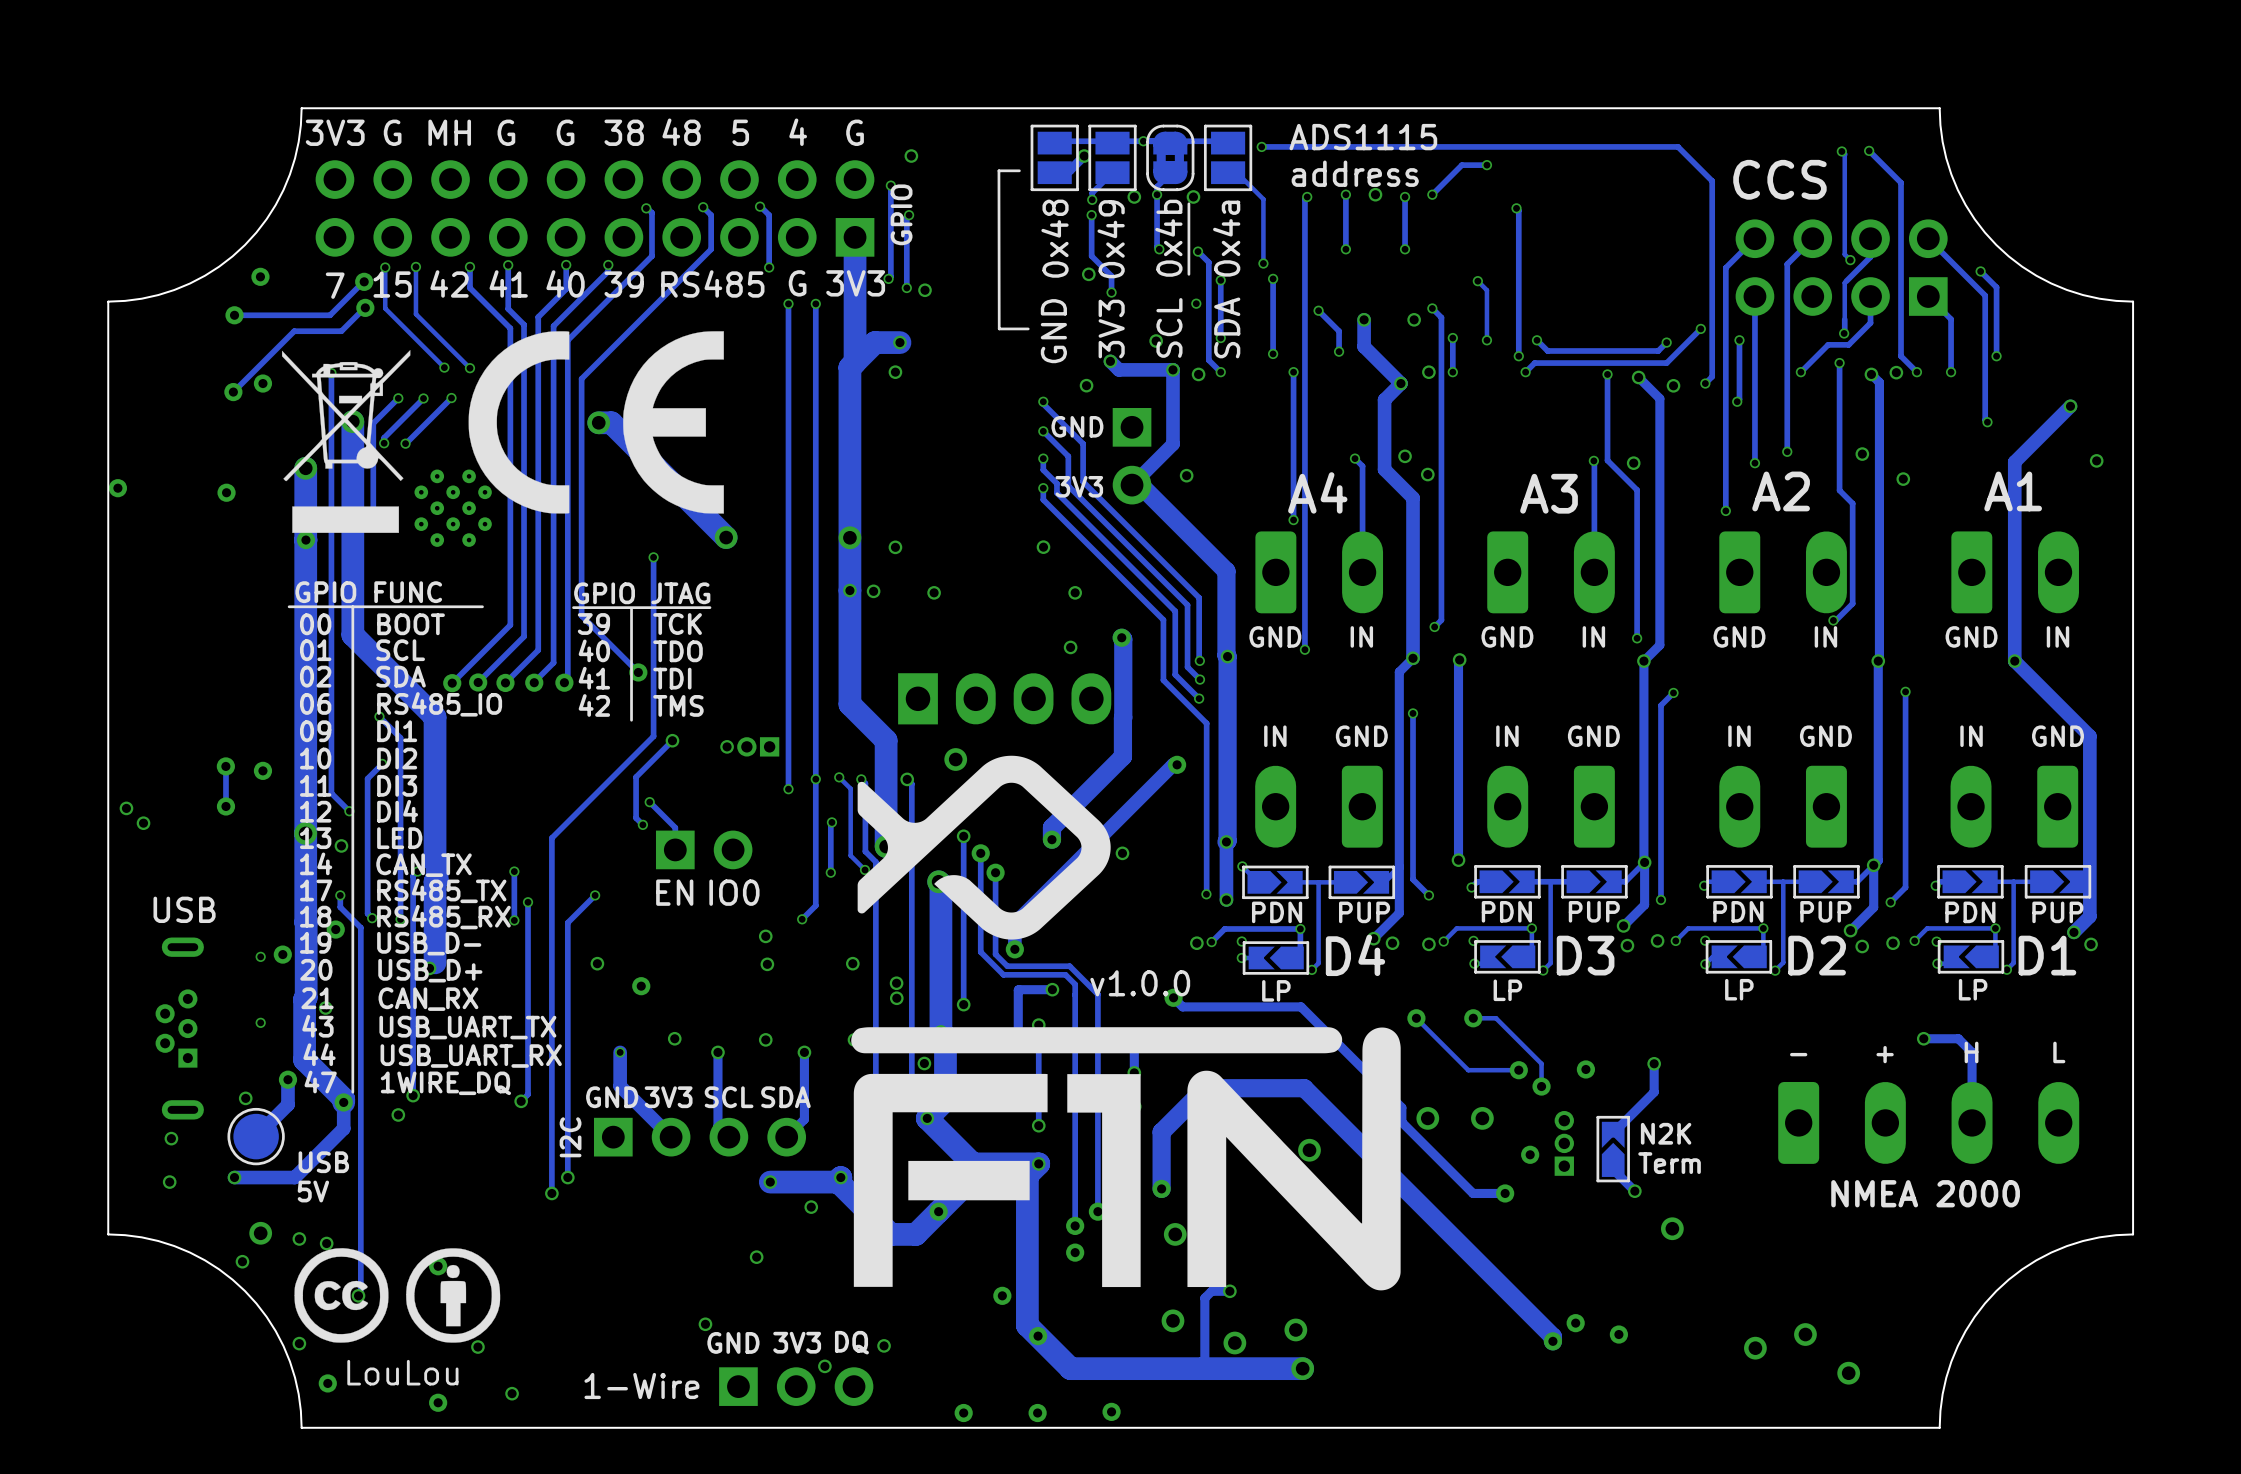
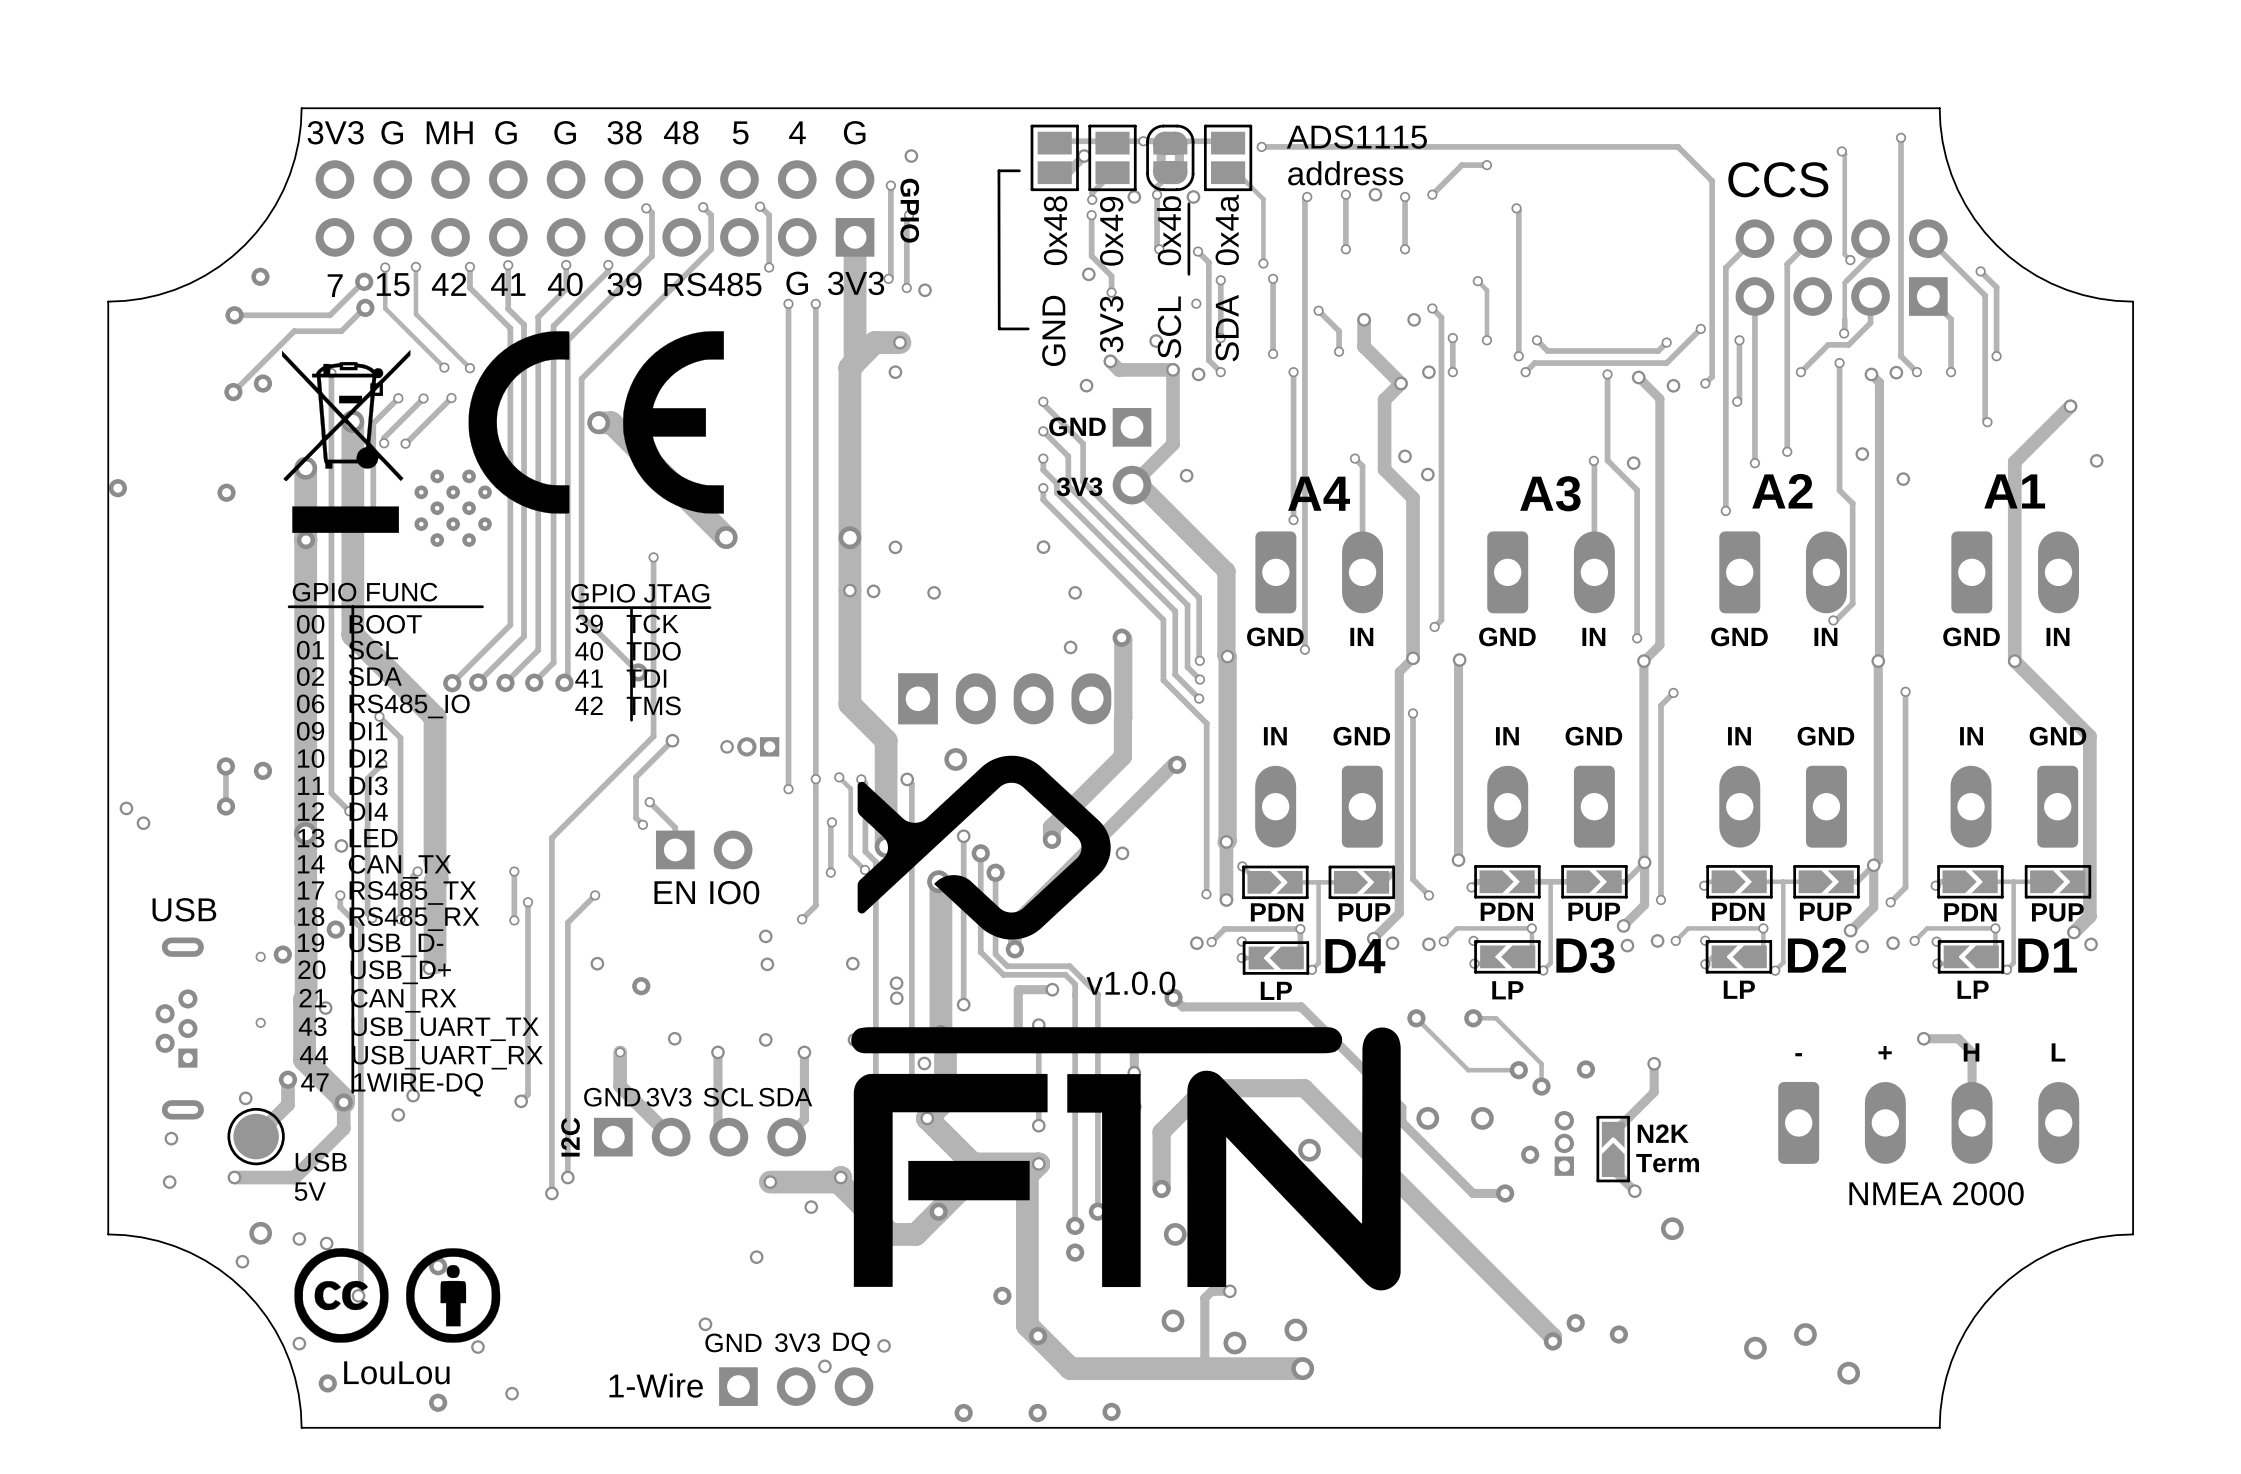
track: (1869, 150) (1901, 182) -> (1901, 137) (1901, 182)
via position: (1869, 150) -> (1901, 137)
text rotation: 0° (901, 214) -> 180° (909, 210)
text: 47 1WIRE_DQ (407, 1082) -> 47 1WIRE-DQ (392, 1084)

